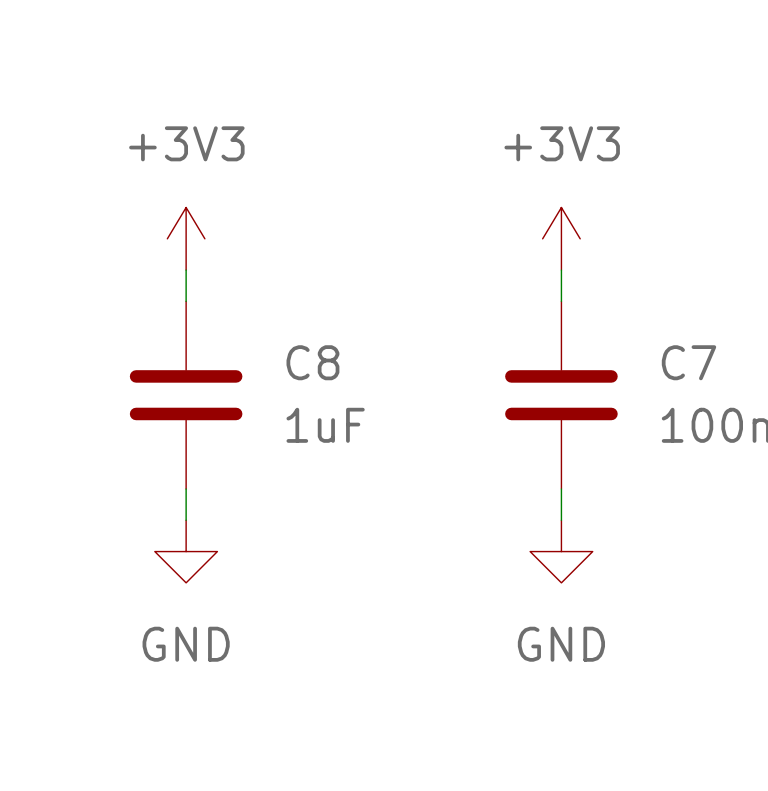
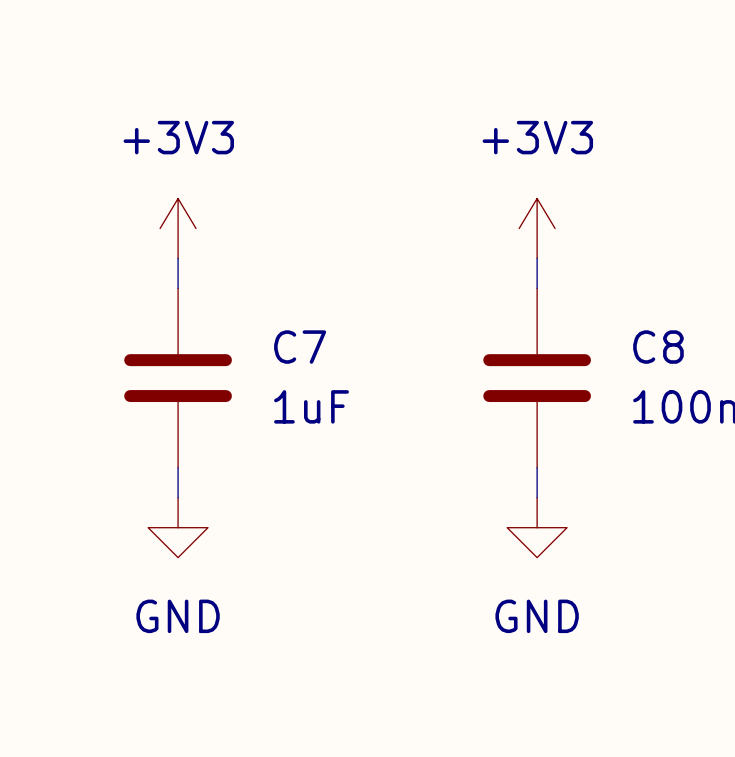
C8 name: C8 (312, 362) -> C7 (300, 347)
C7 name: C7 (689, 362) -> C8 (658, 347)

